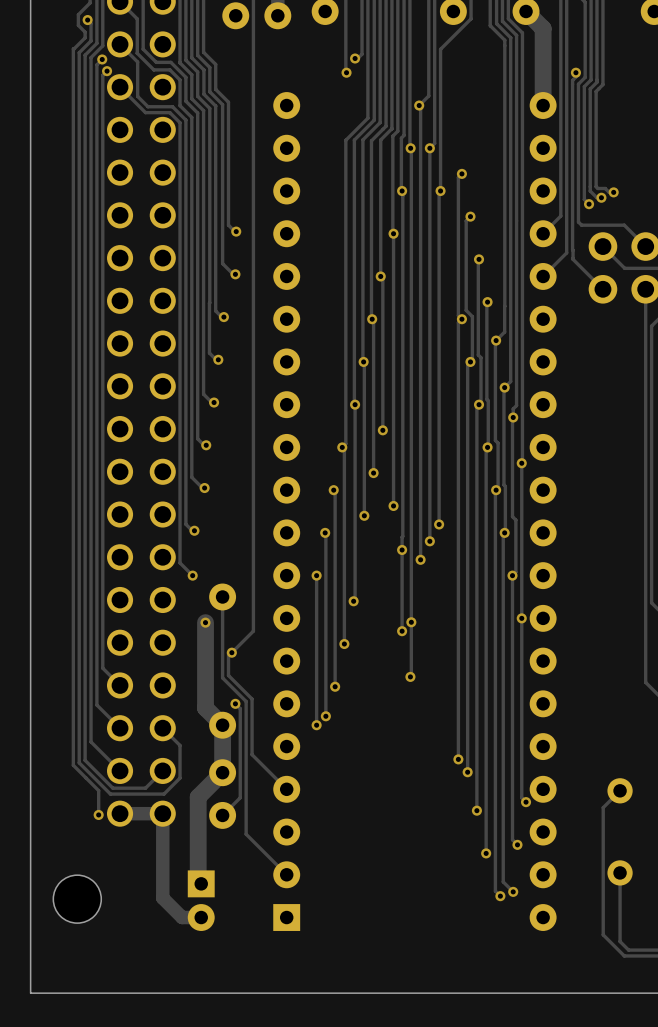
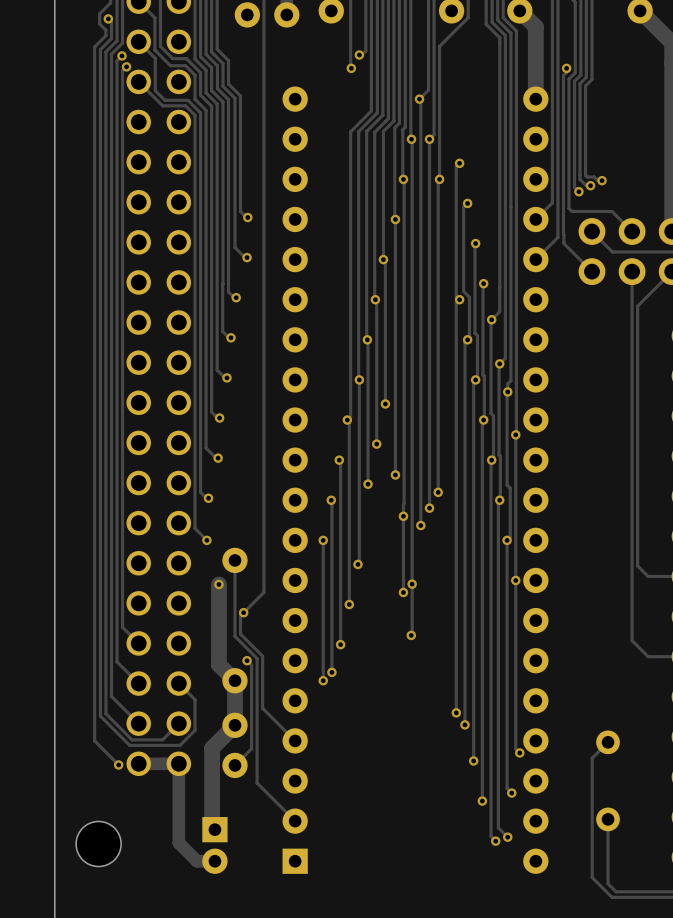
track: (74, 48) (73, 765) (98, 790) (98, 814) -> (95, 46) (94, 740) (118, 764)

